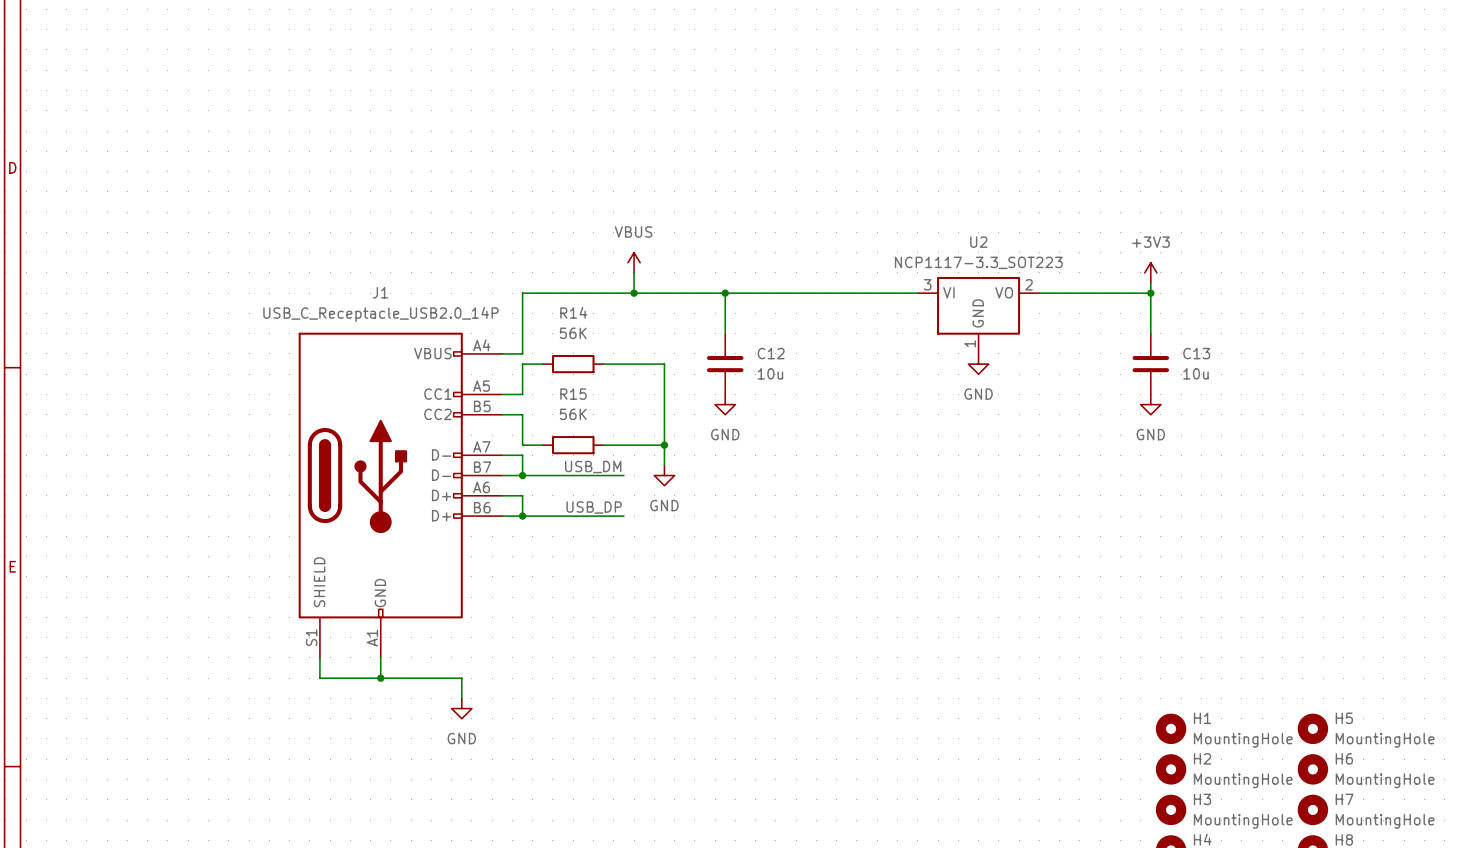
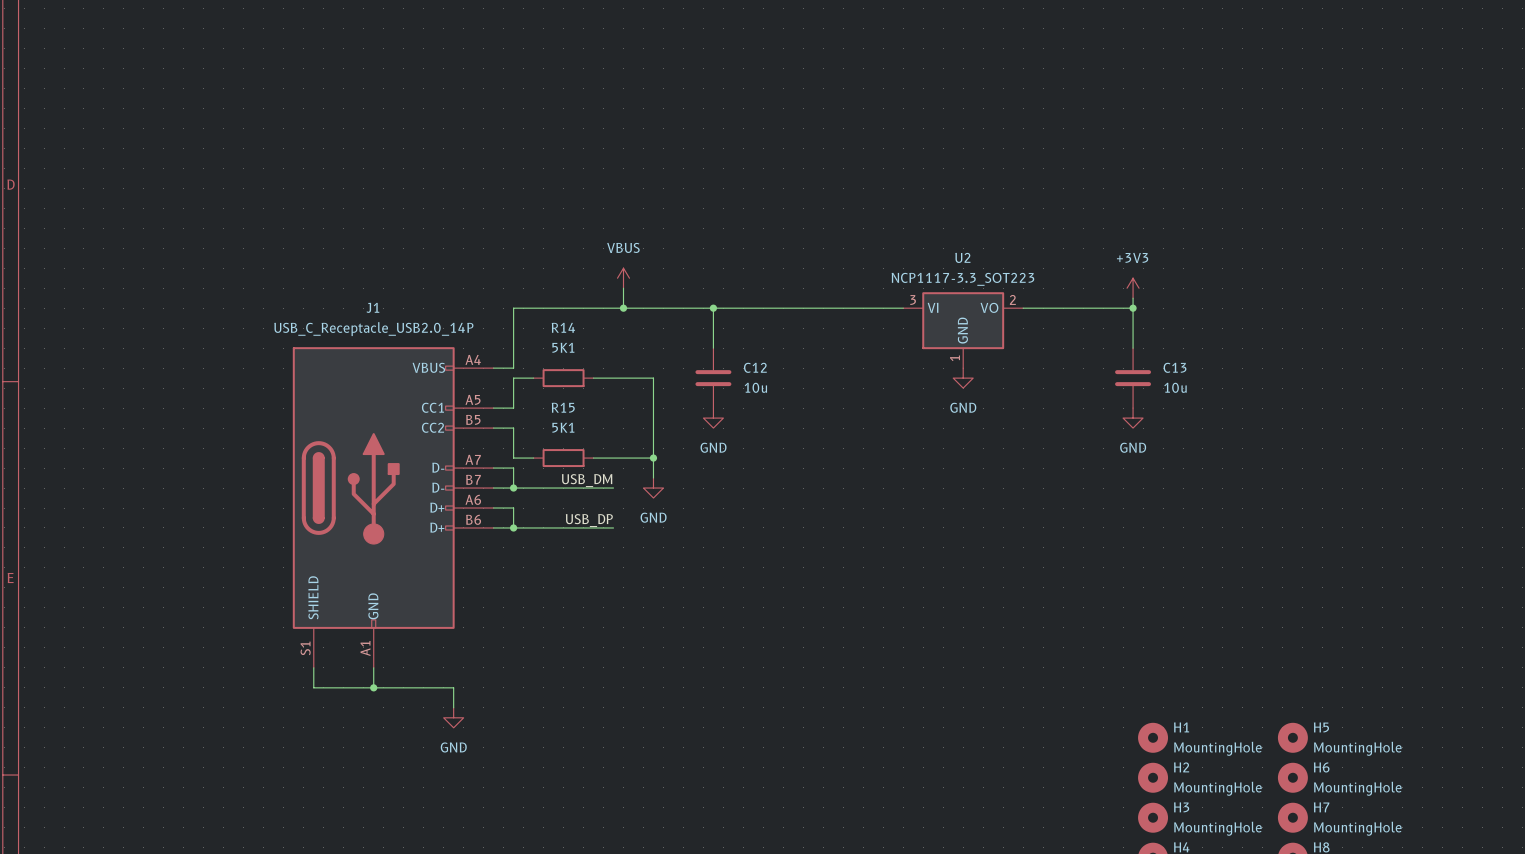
R14 value: 56K (573, 333) -> 5K1 (563, 347)
R15 value: 56K (573, 414) -> 5K1 (563, 427)

